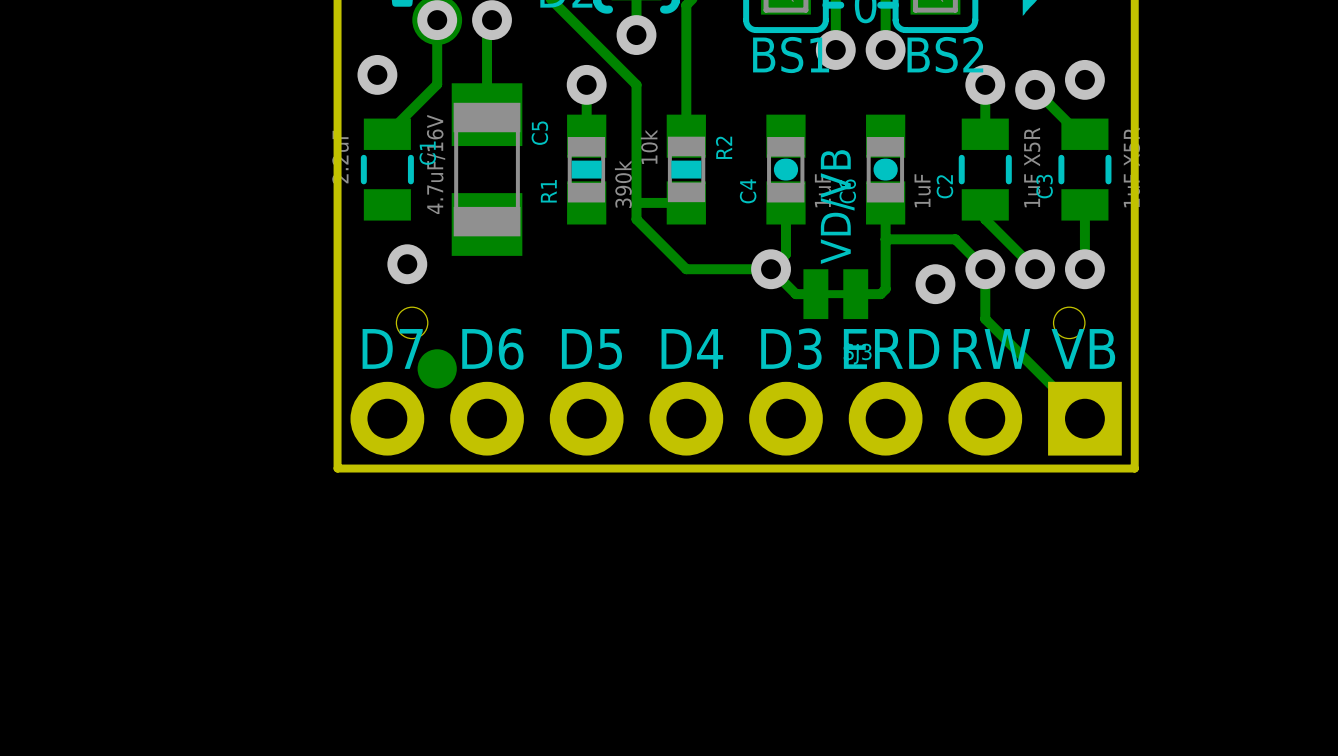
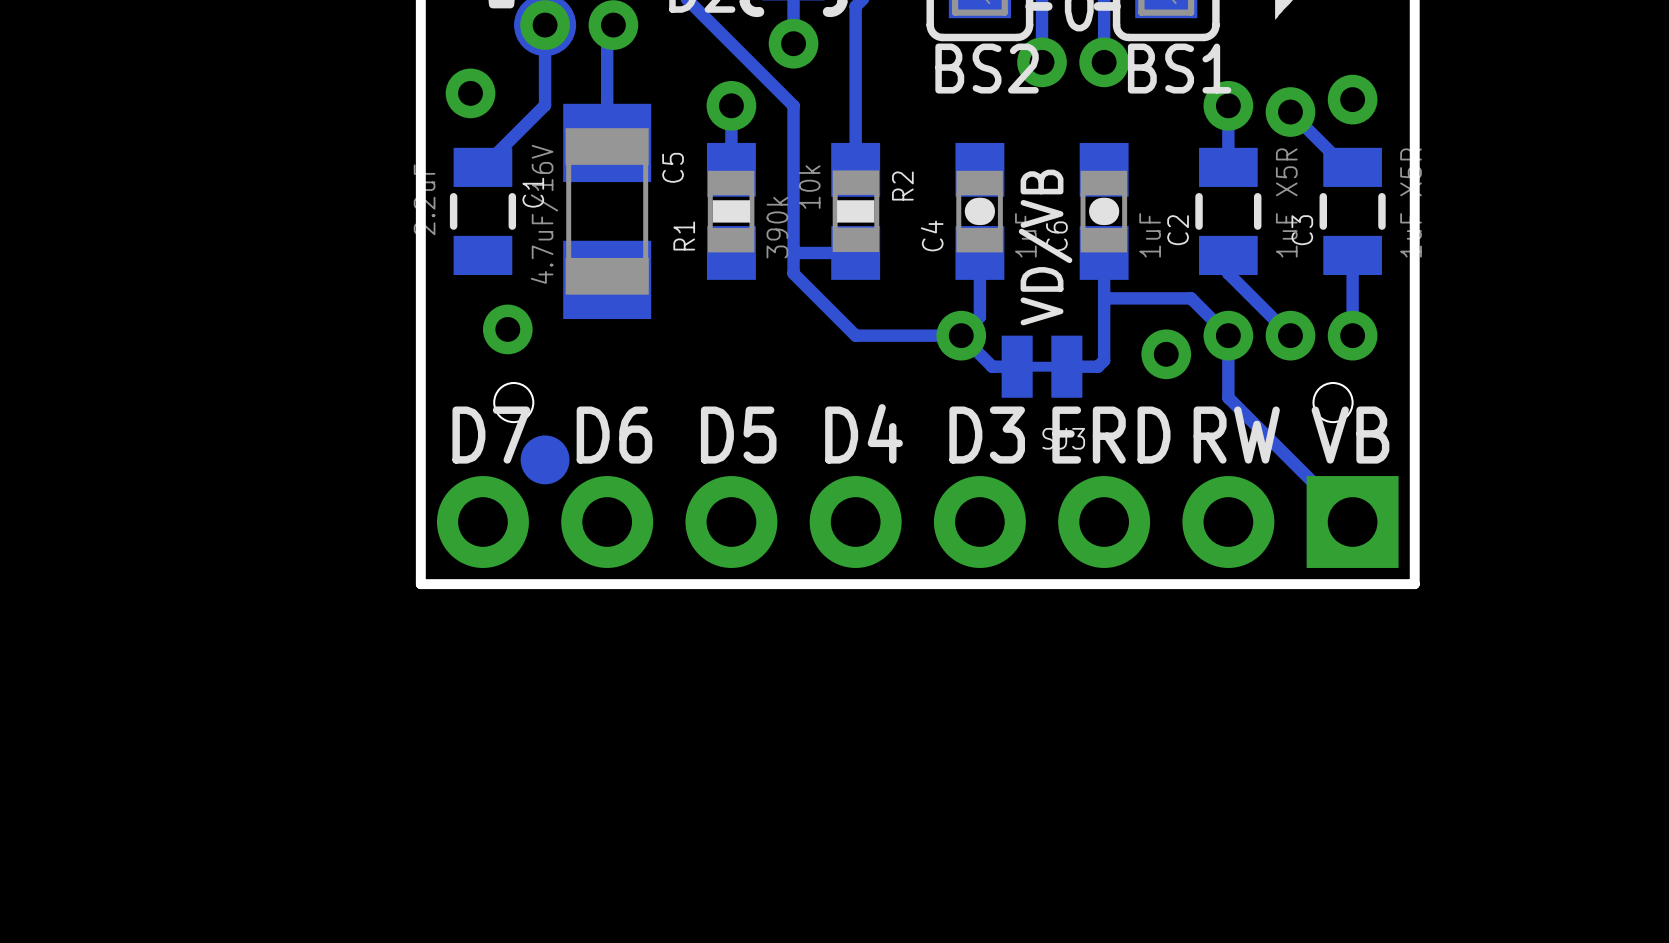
text: BS1 (791, 55) -> BS2 (987, 68)
text: BS2 (945, 55) -> BS1 (1179, 68)

